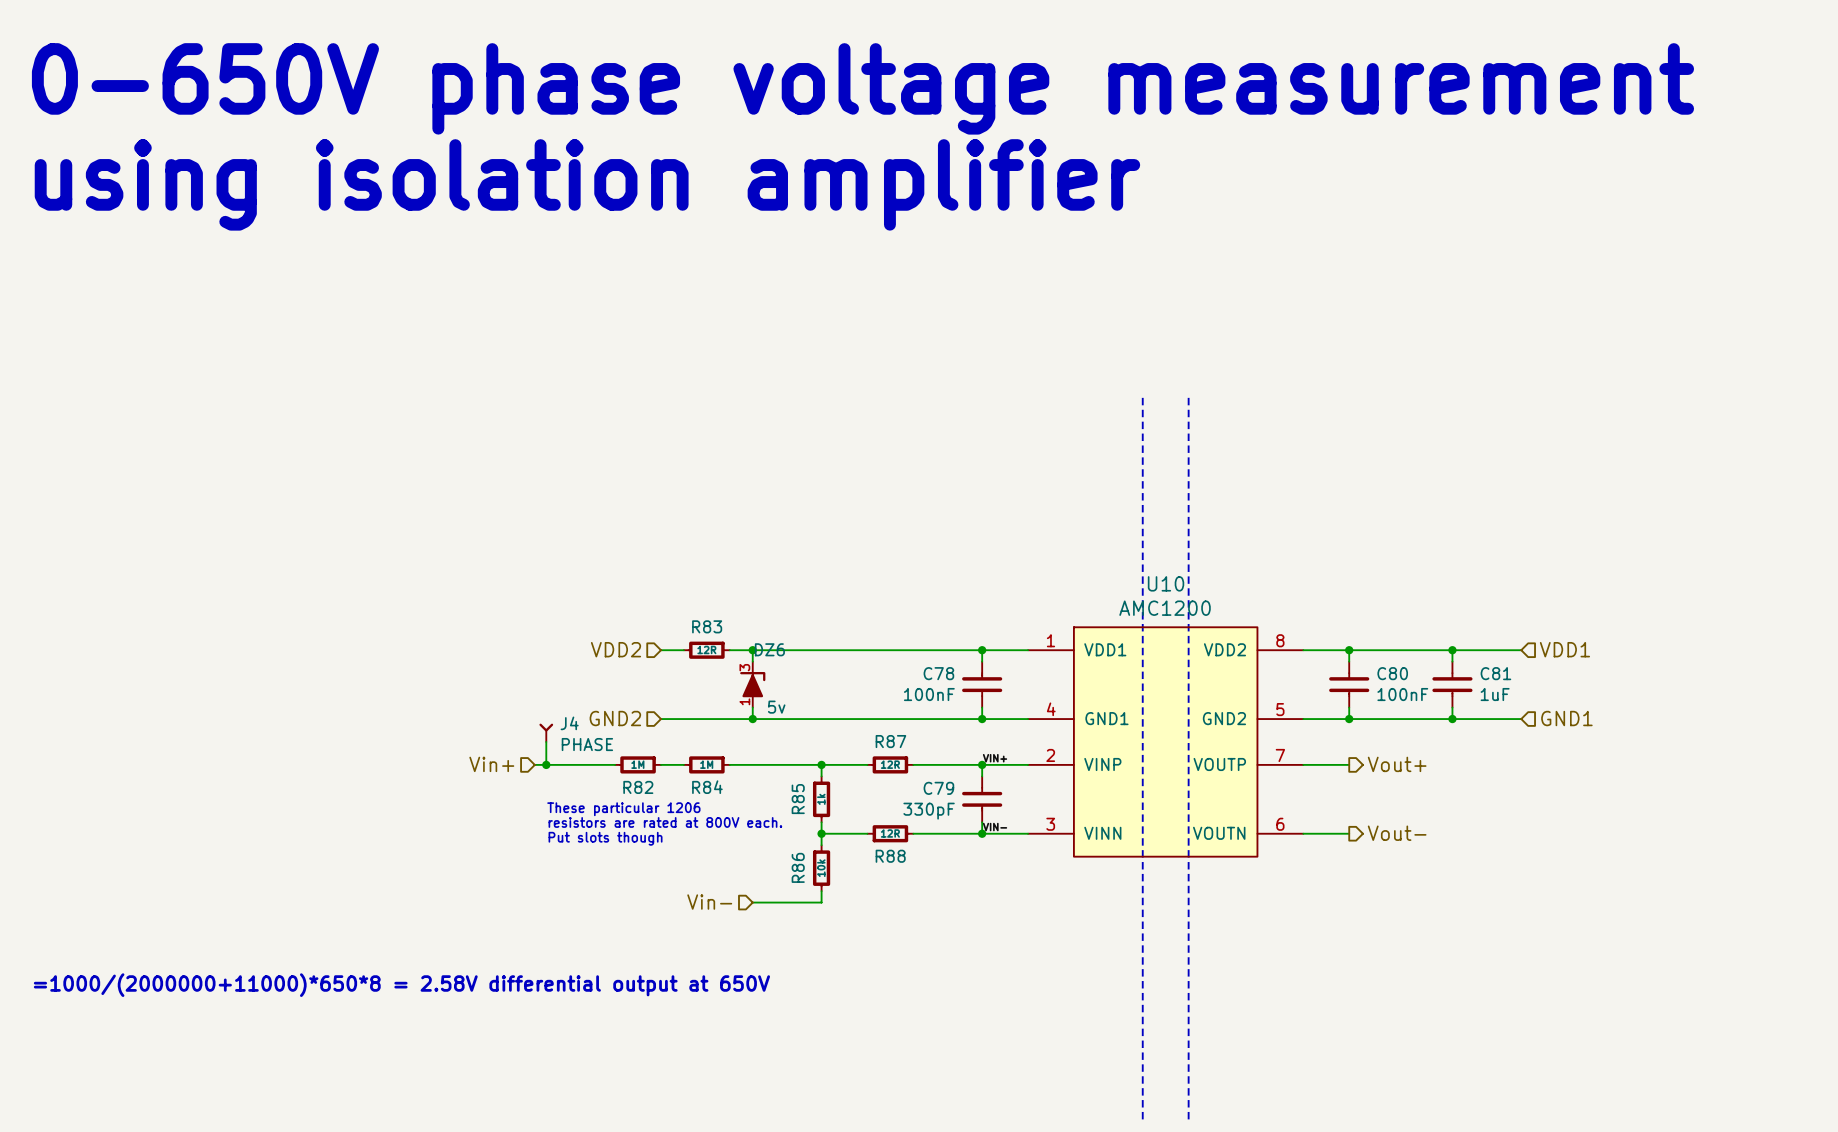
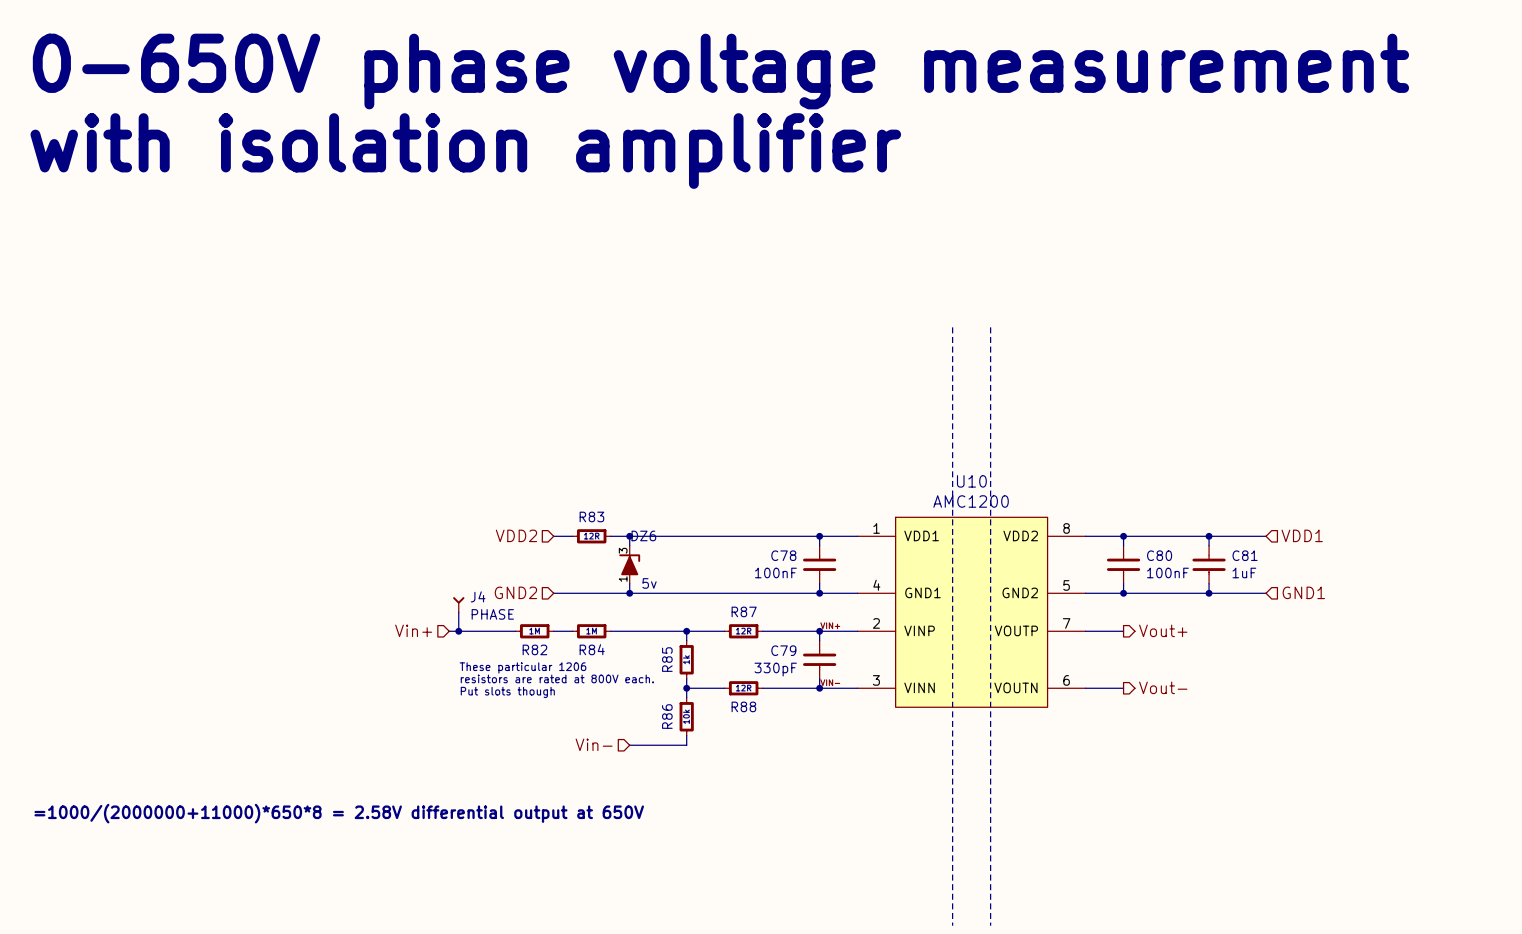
text: using isolation amplifier (587, 184) -> with isolation amplifier (465, 151)

